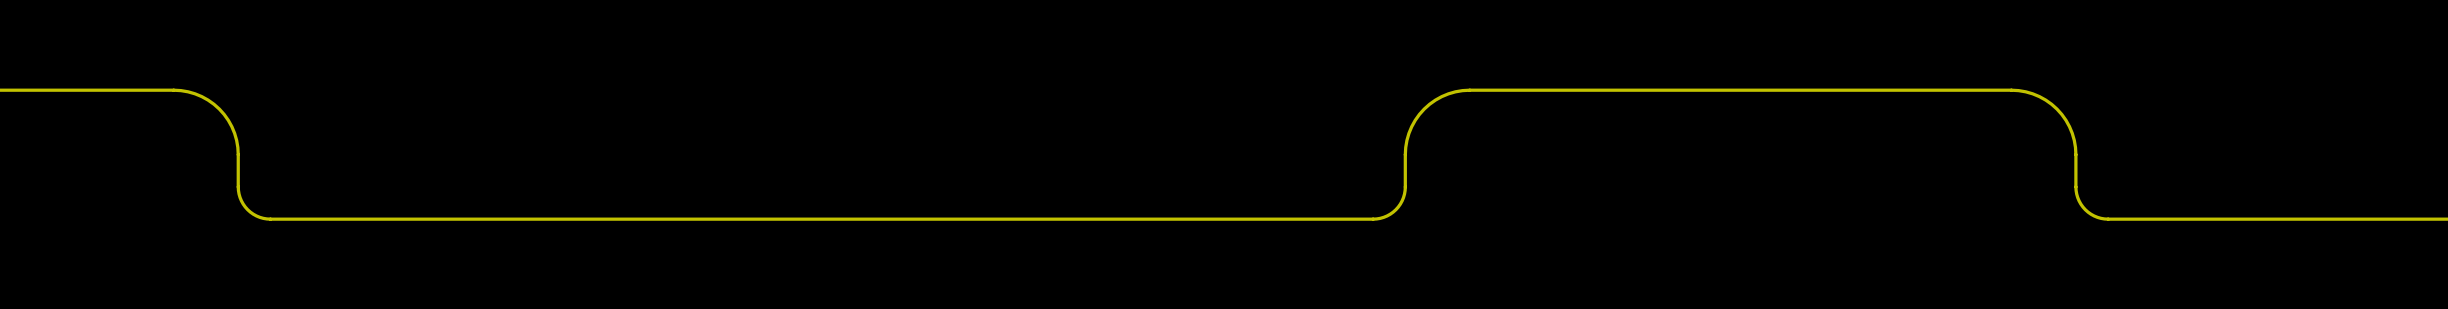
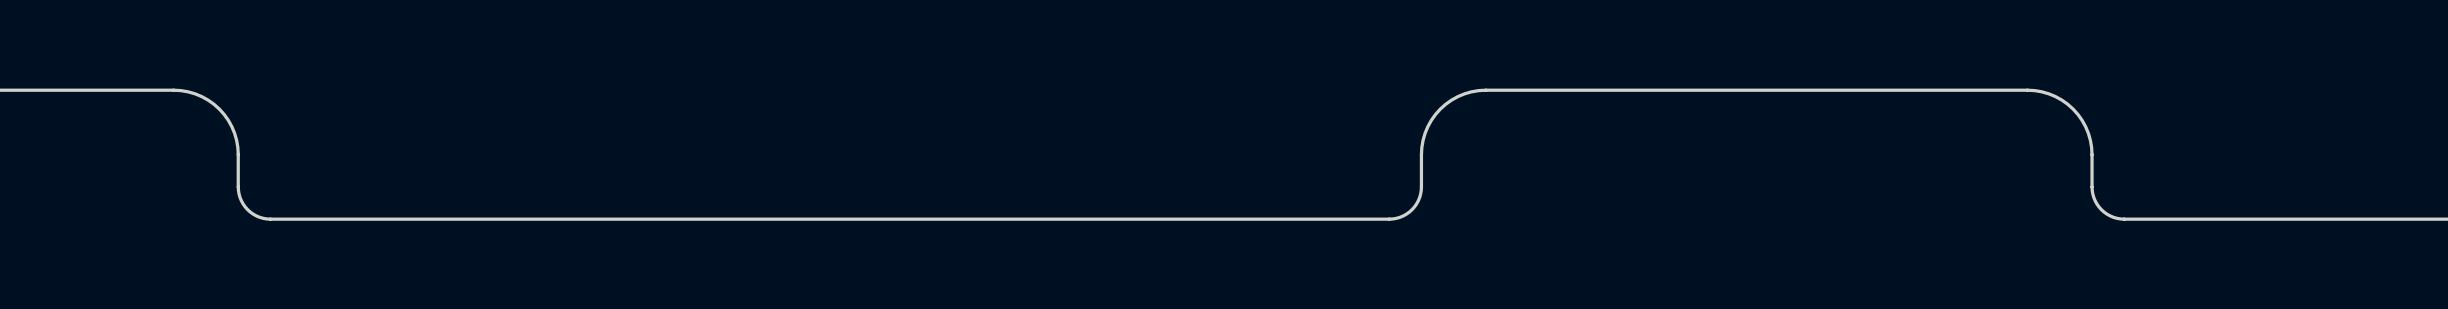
board edge: (1485, 90) (1462, 90) (1448, 93) (1429, 104) (1419, 114) (1411, 126) (1406, 140) (1405, 190) (1402, 200) (1390, 214) (1373, 219) -> (1485, 90) (1464, 93) (1451, 100) (1440, 109) (1431, 120) (1423, 140) (1421, 190) (1414, 207) (1399, 217) (1373, 219)
board edge: (2011, 90) (2025, 91) (2039, 96) (2057, 109) (2066, 120) (2074, 140) (2076, 190) (2082, 207) (2097, 217) (2124, 219) -> (2011, 90) (2034, 90) (2048, 93) (2061, 100) (2077, 114) (2085, 126) (2090, 140) (2092, 190) (2095, 200) (2107, 214) (2124, 219)

